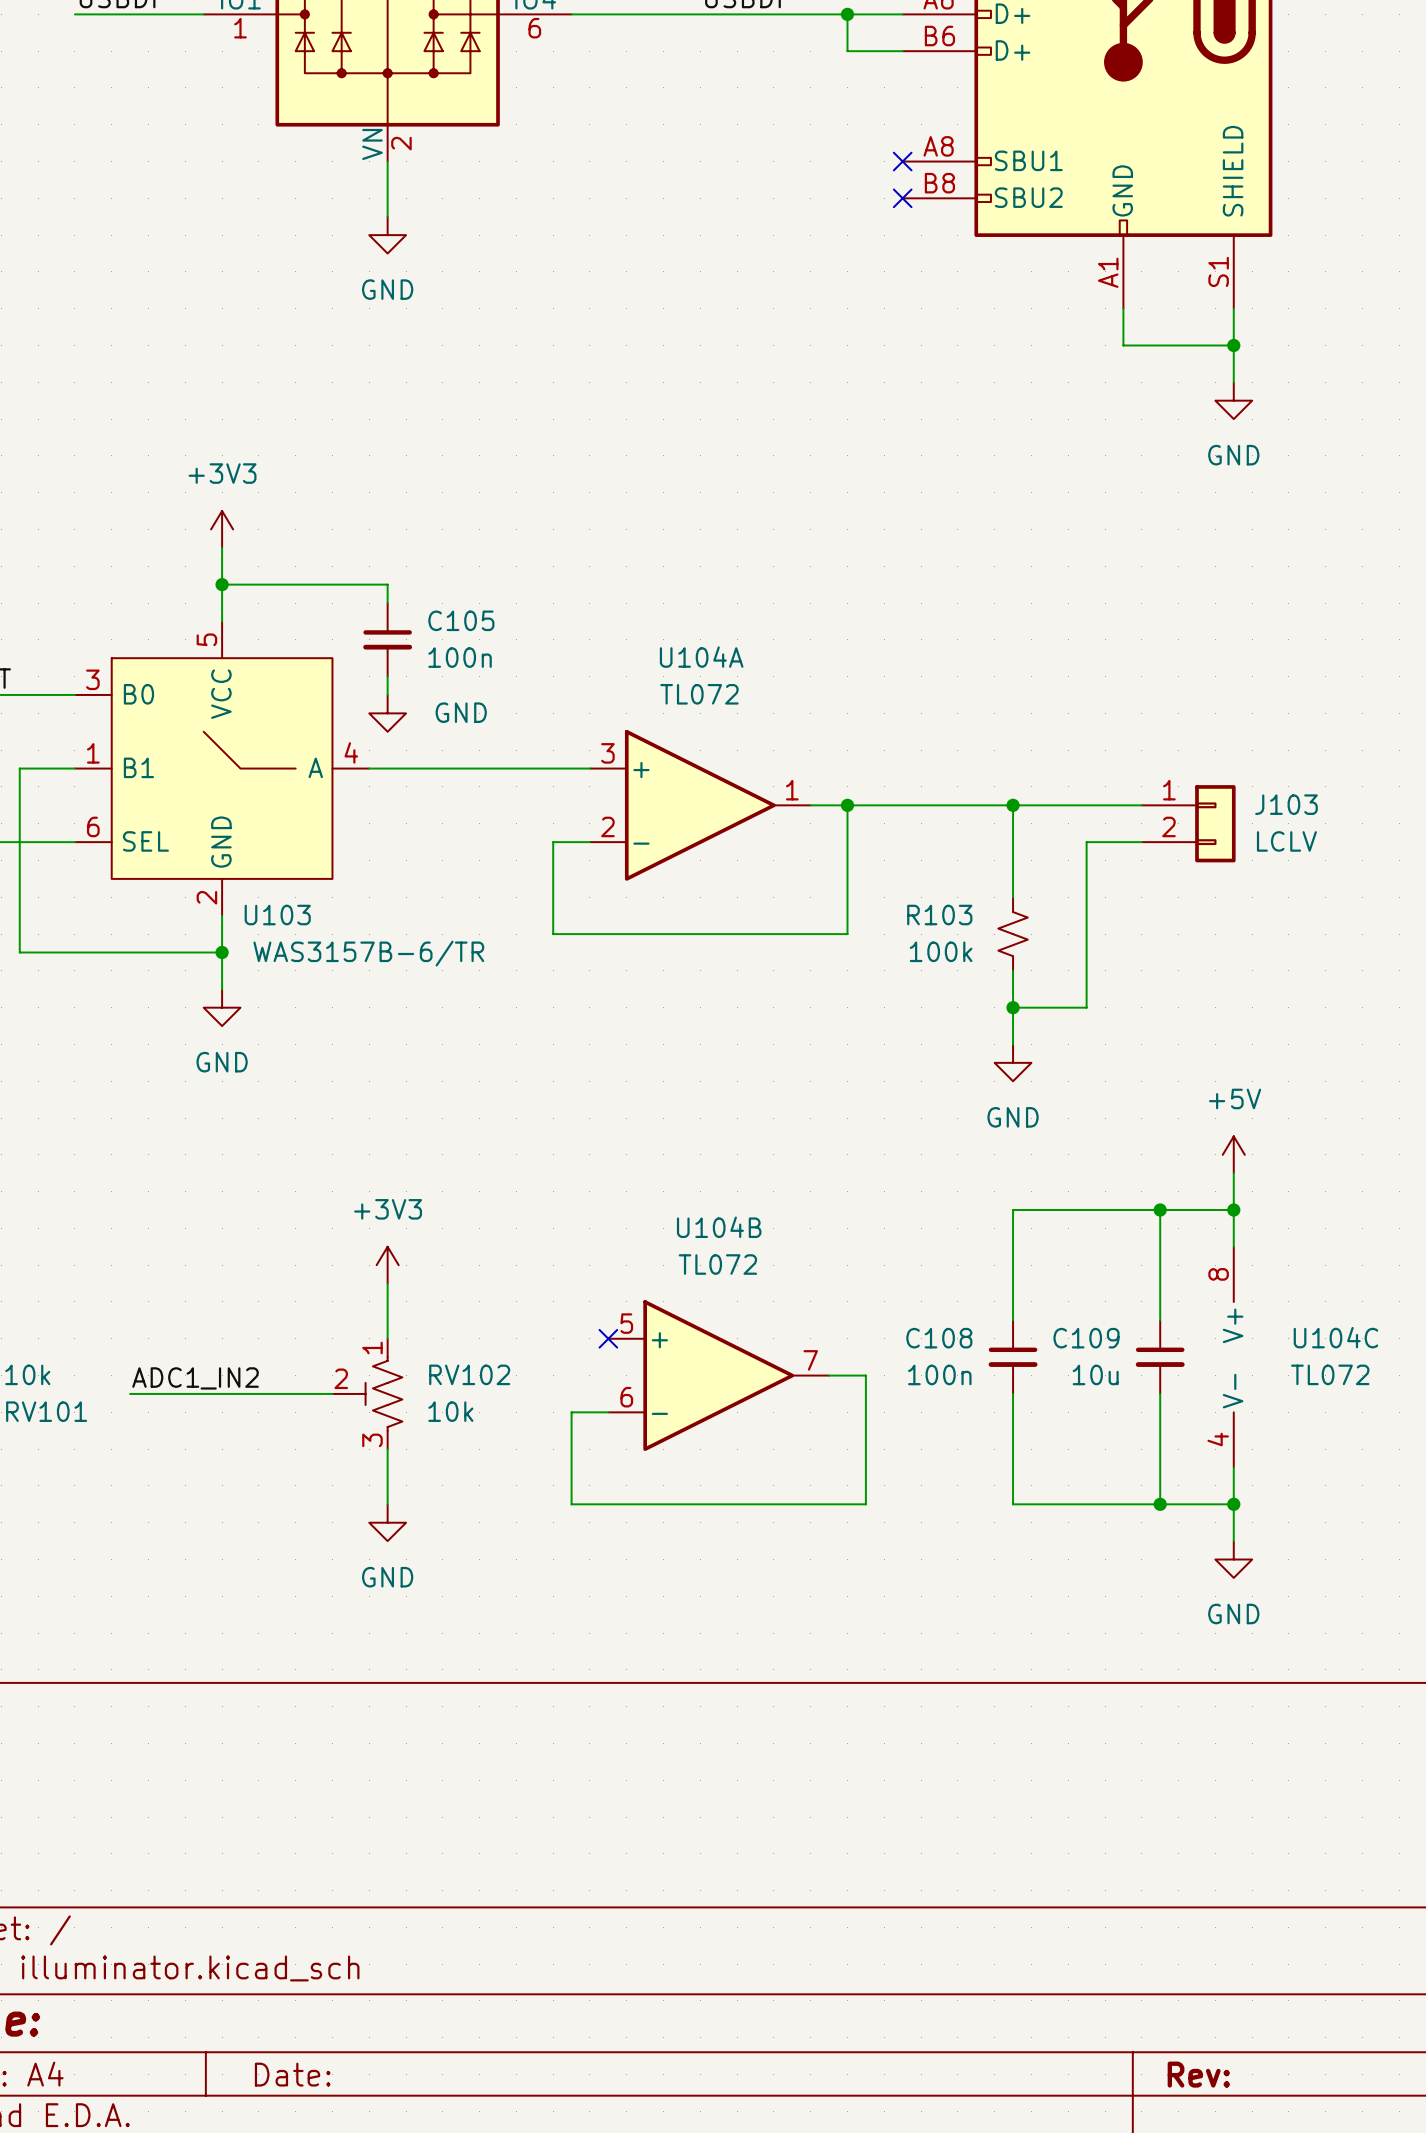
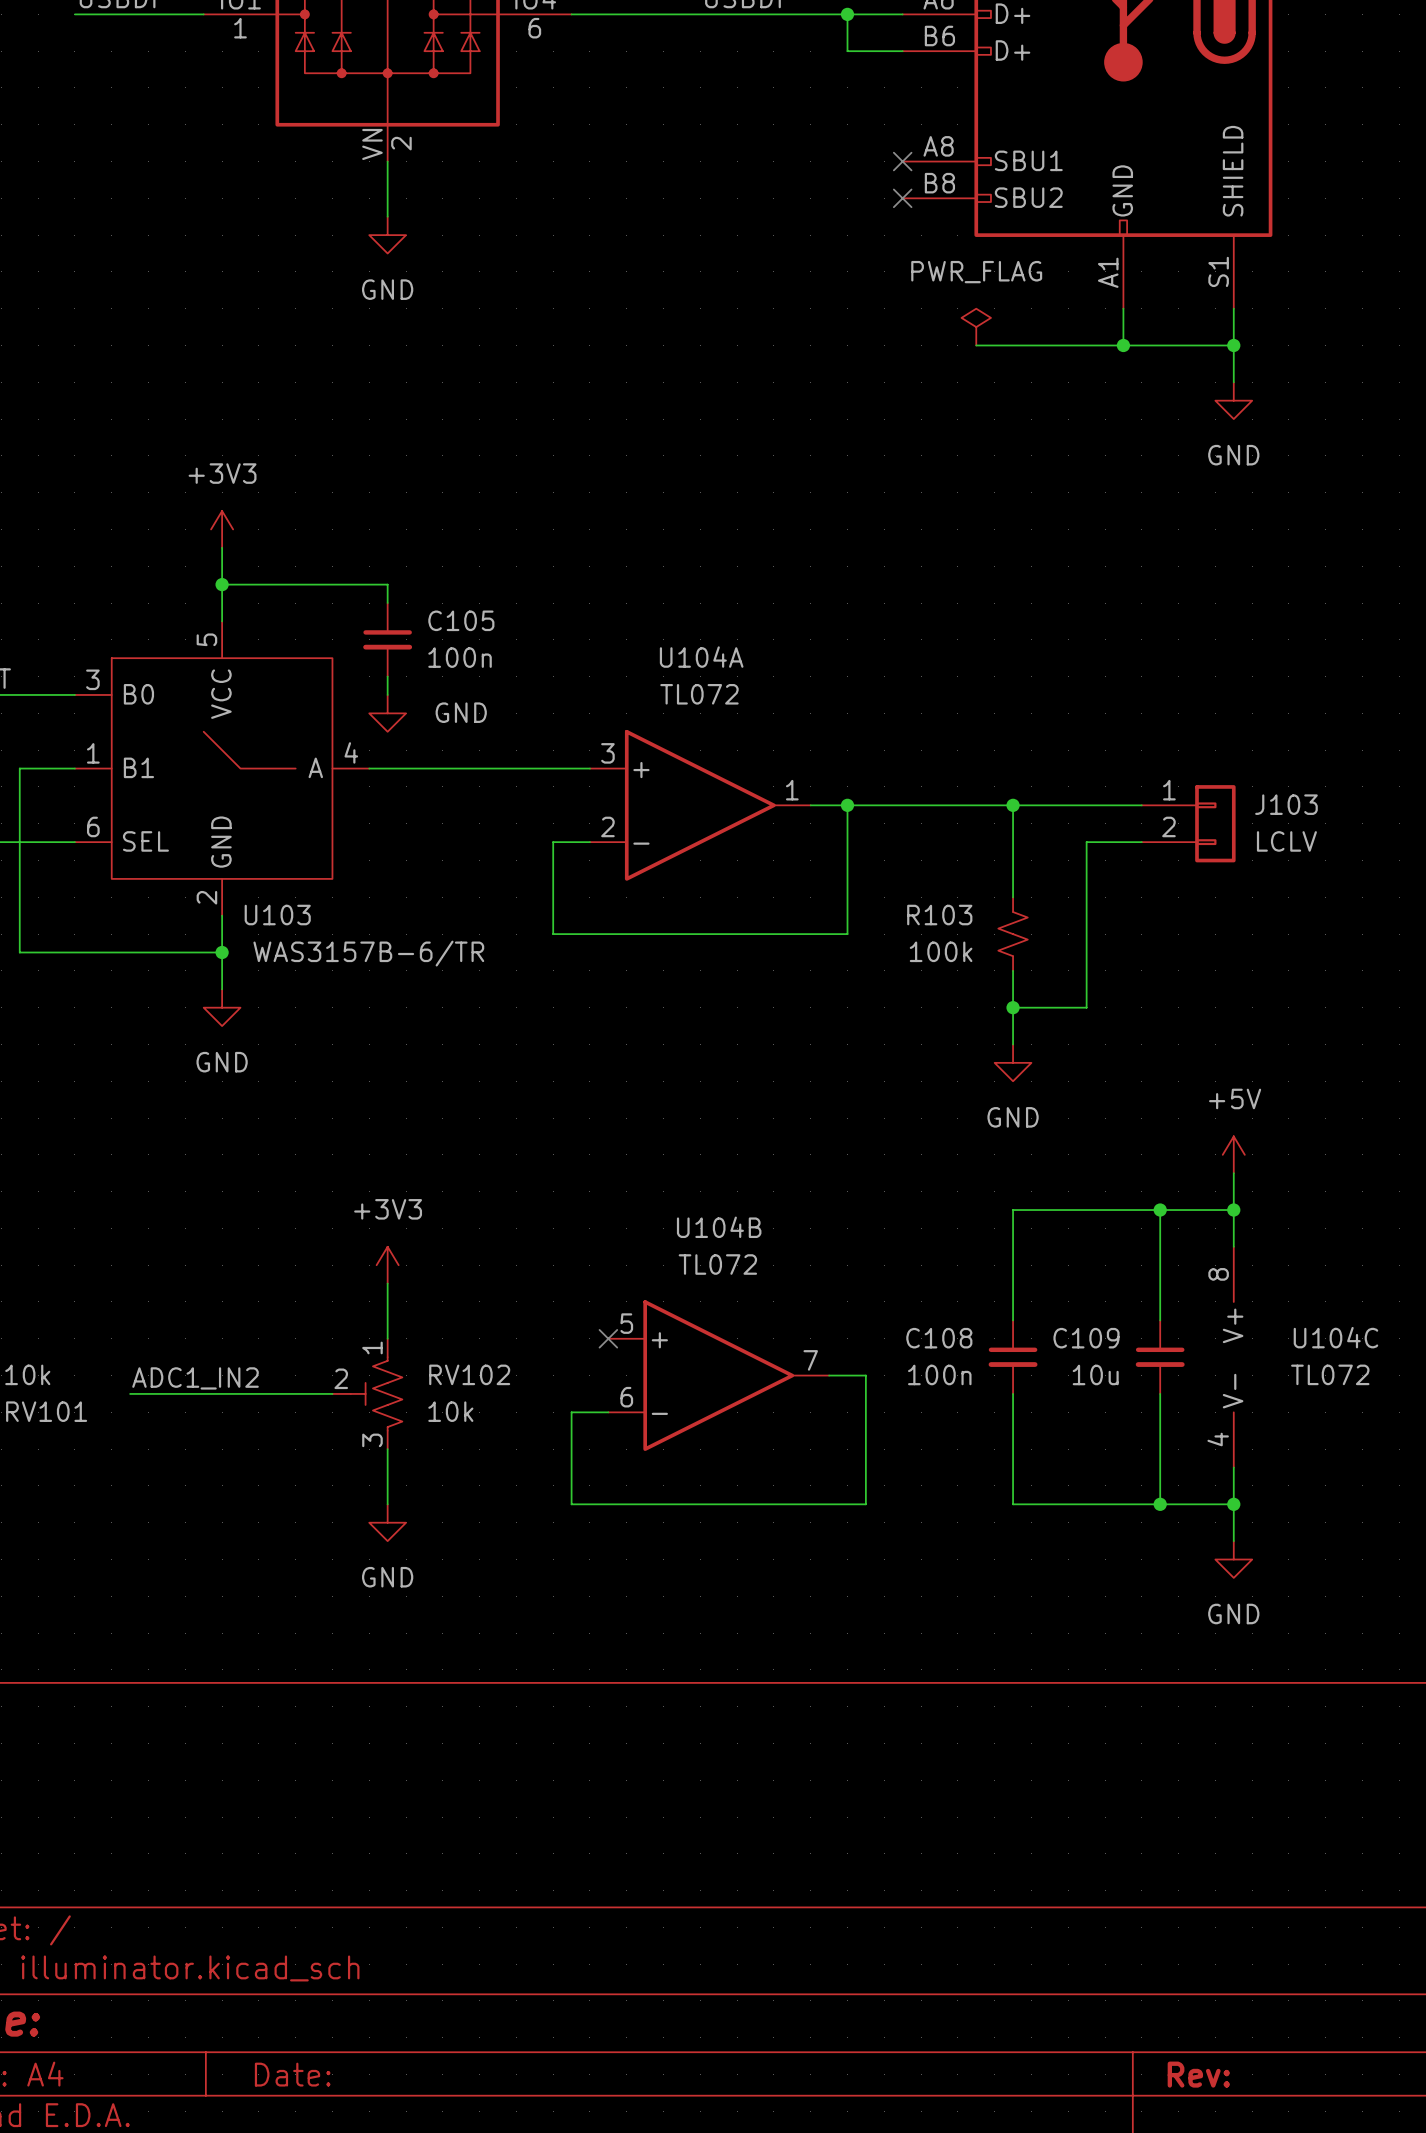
power symbol: none -> PWR_FLAG (976, 327)
wire: none -> (976, 345) (1123, 345)
junction: none -> (1123, 345)

